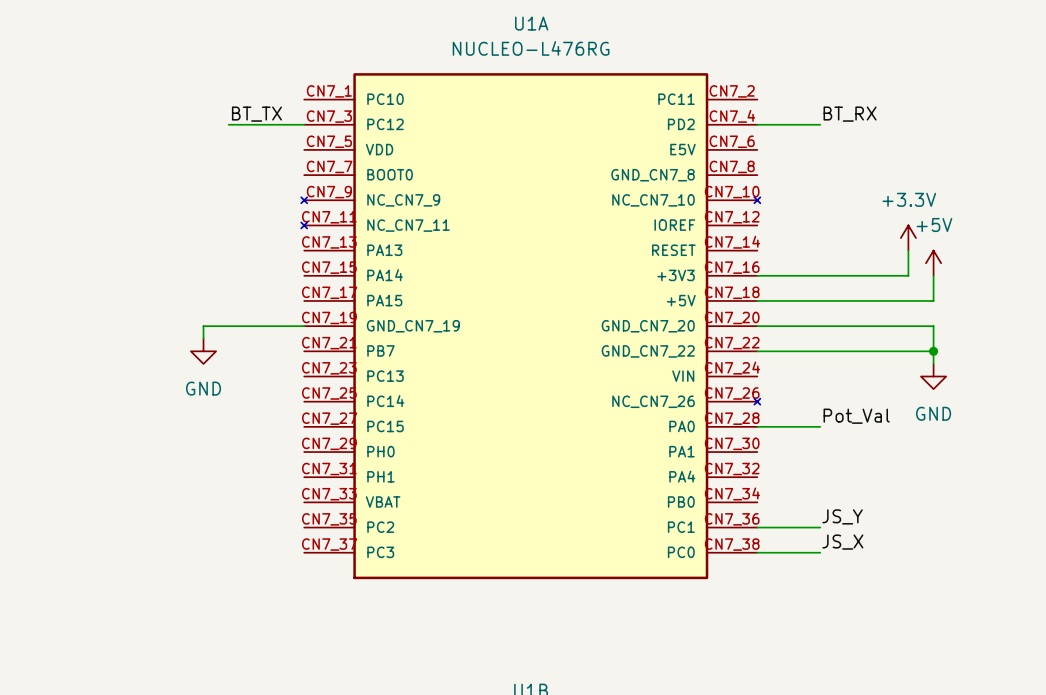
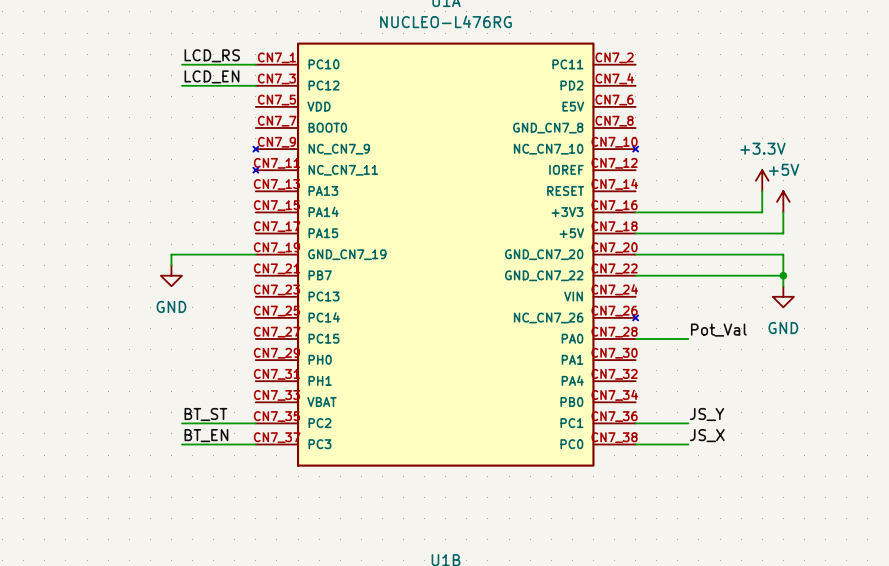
label: none -> LCD_RS (212, 55)
wire: none -> (181, 64) (255, 64)
label: none -> LCD_EN (211, 76)
label: BT_TX (256, 114) -> none
label: BT_RX (850, 114) -> none
wire: none -> (181, 85) (192, 85)
wire: (757, 124) (820, 124) -> none
label: none -> BT_ST (205, 414)
wire: none -> (181, 423) (255, 423)
label: none -> BT_EN (206, 435)
wire: none -> (181, 444) (255, 444)

